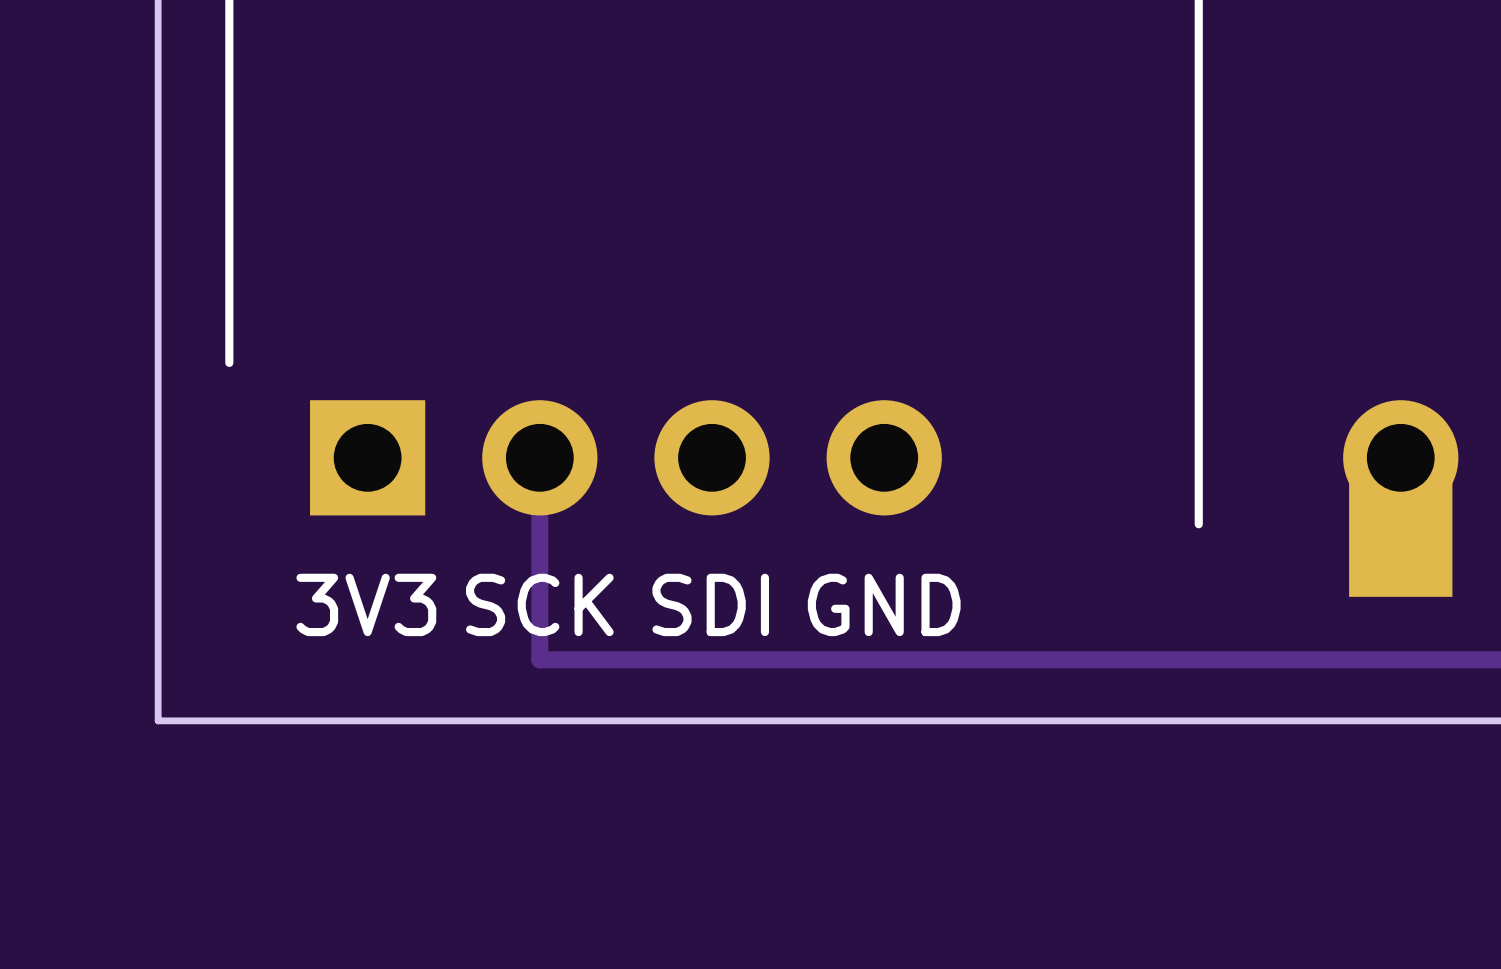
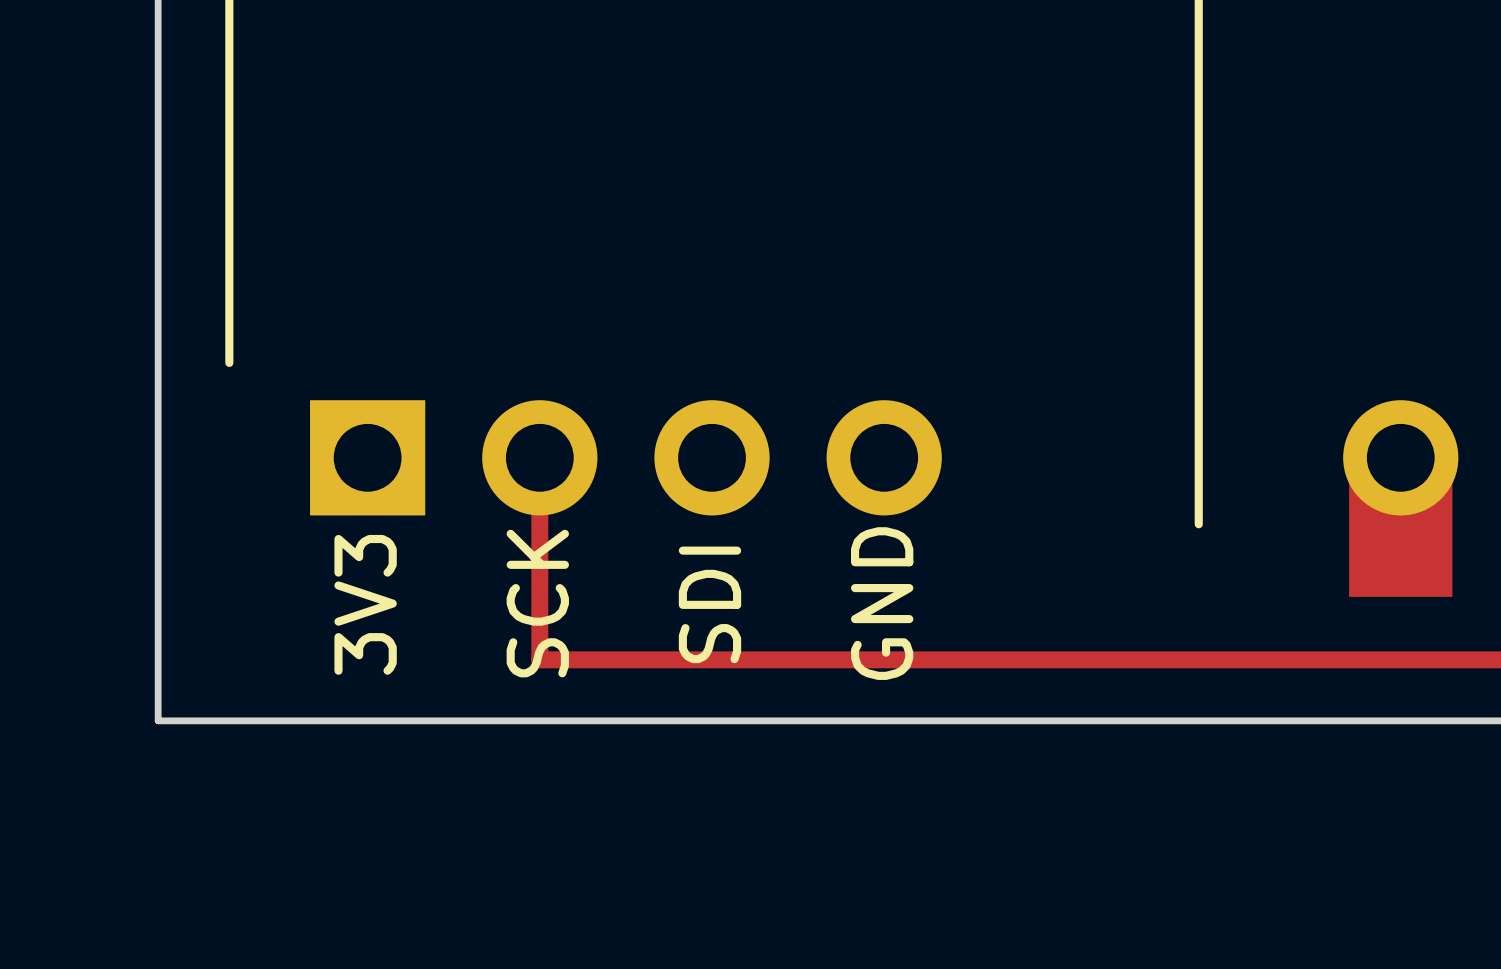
part text rotation: 0° (366, 604) -> 90° counterclockwise (365, 604)
part text rotation: 0° (539, 604) -> 90° counterclockwise (537, 603)
part text rotation: 0° (710, 604) -> 90° counterclockwise (709, 604)
part text rotation: 0° (884, 604) -> 90° counterclockwise (882, 603)

